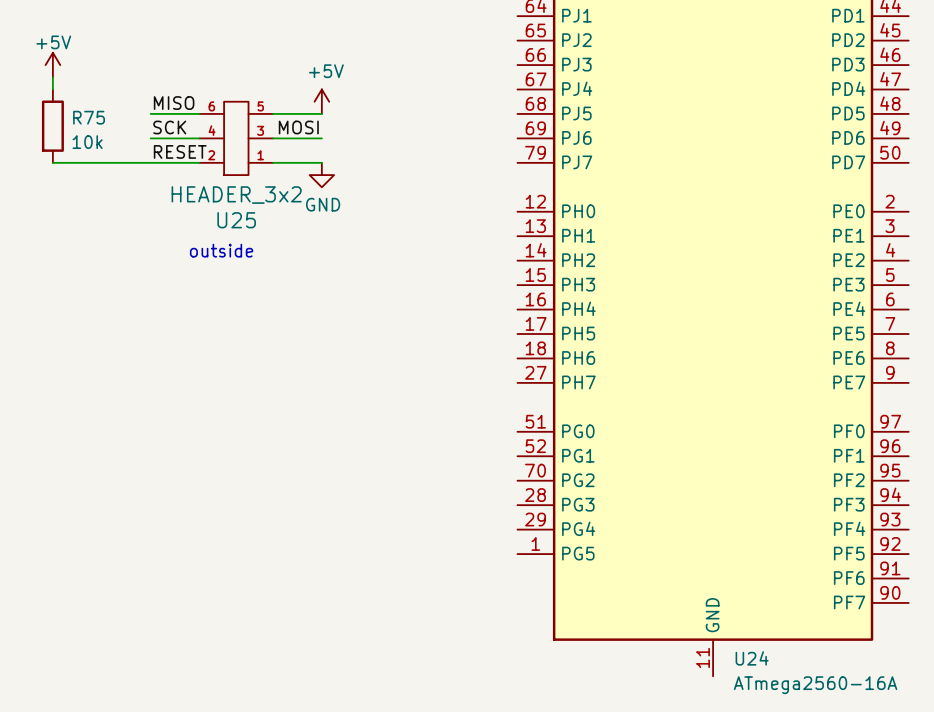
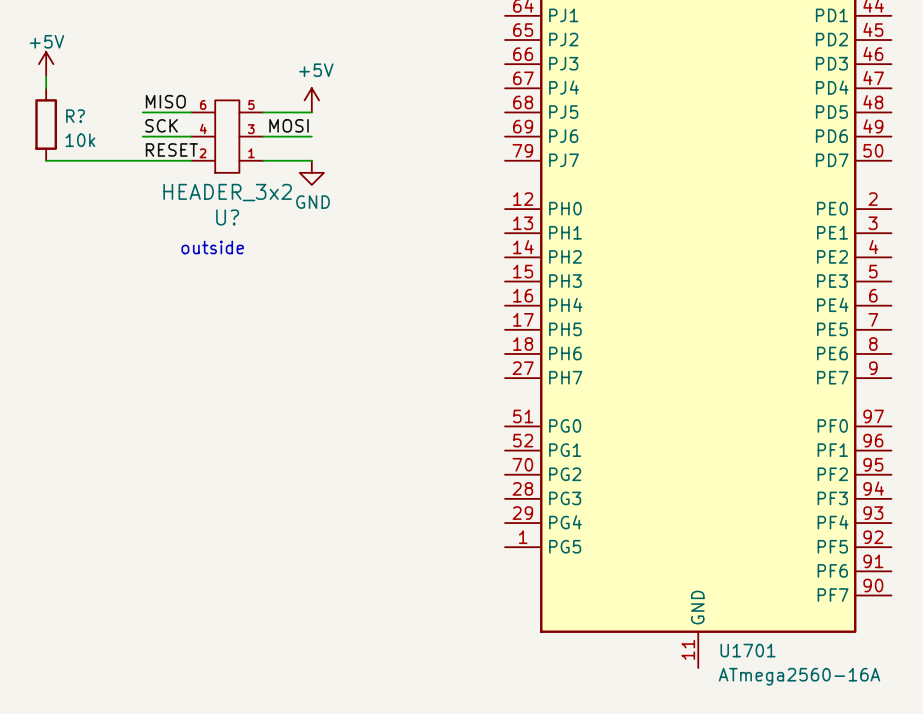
R75 name: R75 (89, 117) -> R? (75, 116)
U25 name: U25 (236, 220) -> U? (227, 217)
U24 name: U24 (752, 658) -> U1701 (748, 650)

